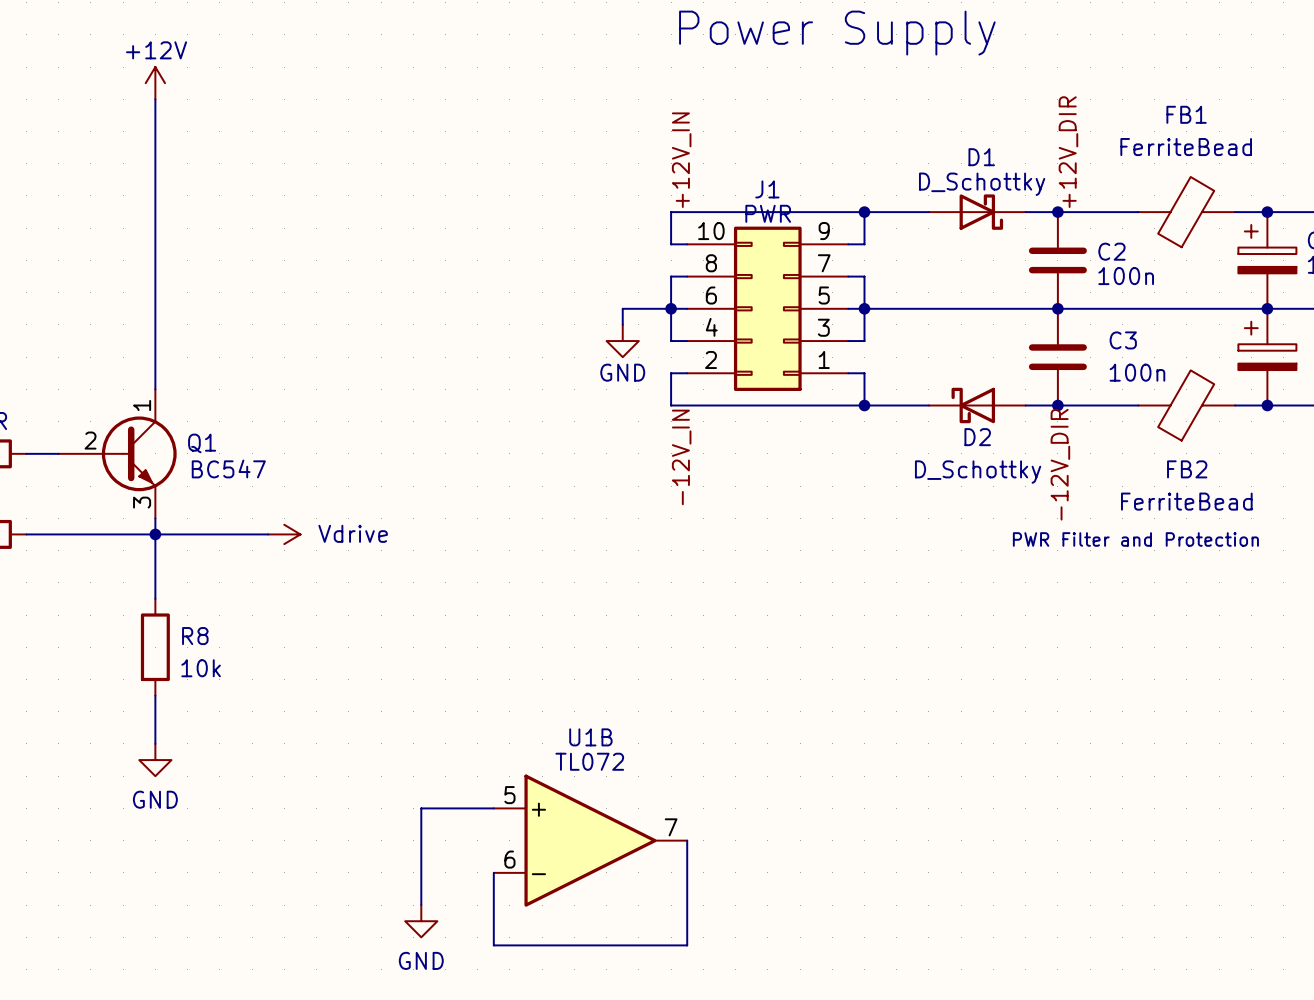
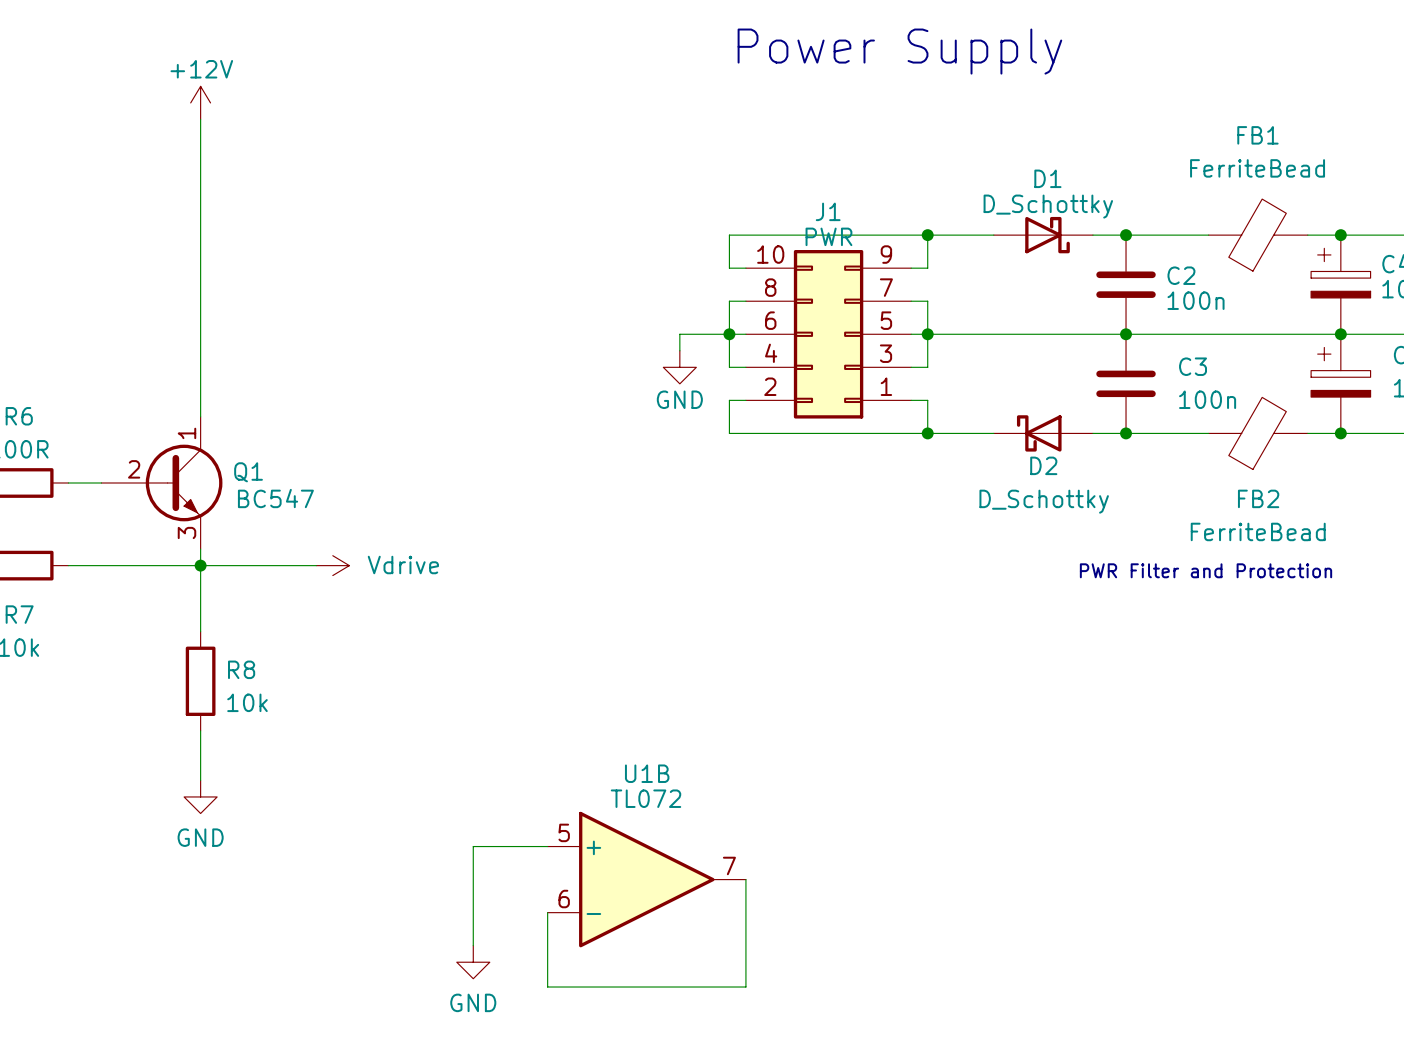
label: +12V_DIR (1068, 152) -> none
label: +12V_IN (681, 160) -> none
label: -12V_IN (681, 457) -> none
label: -12V_DIR (1060, 464) -> none

